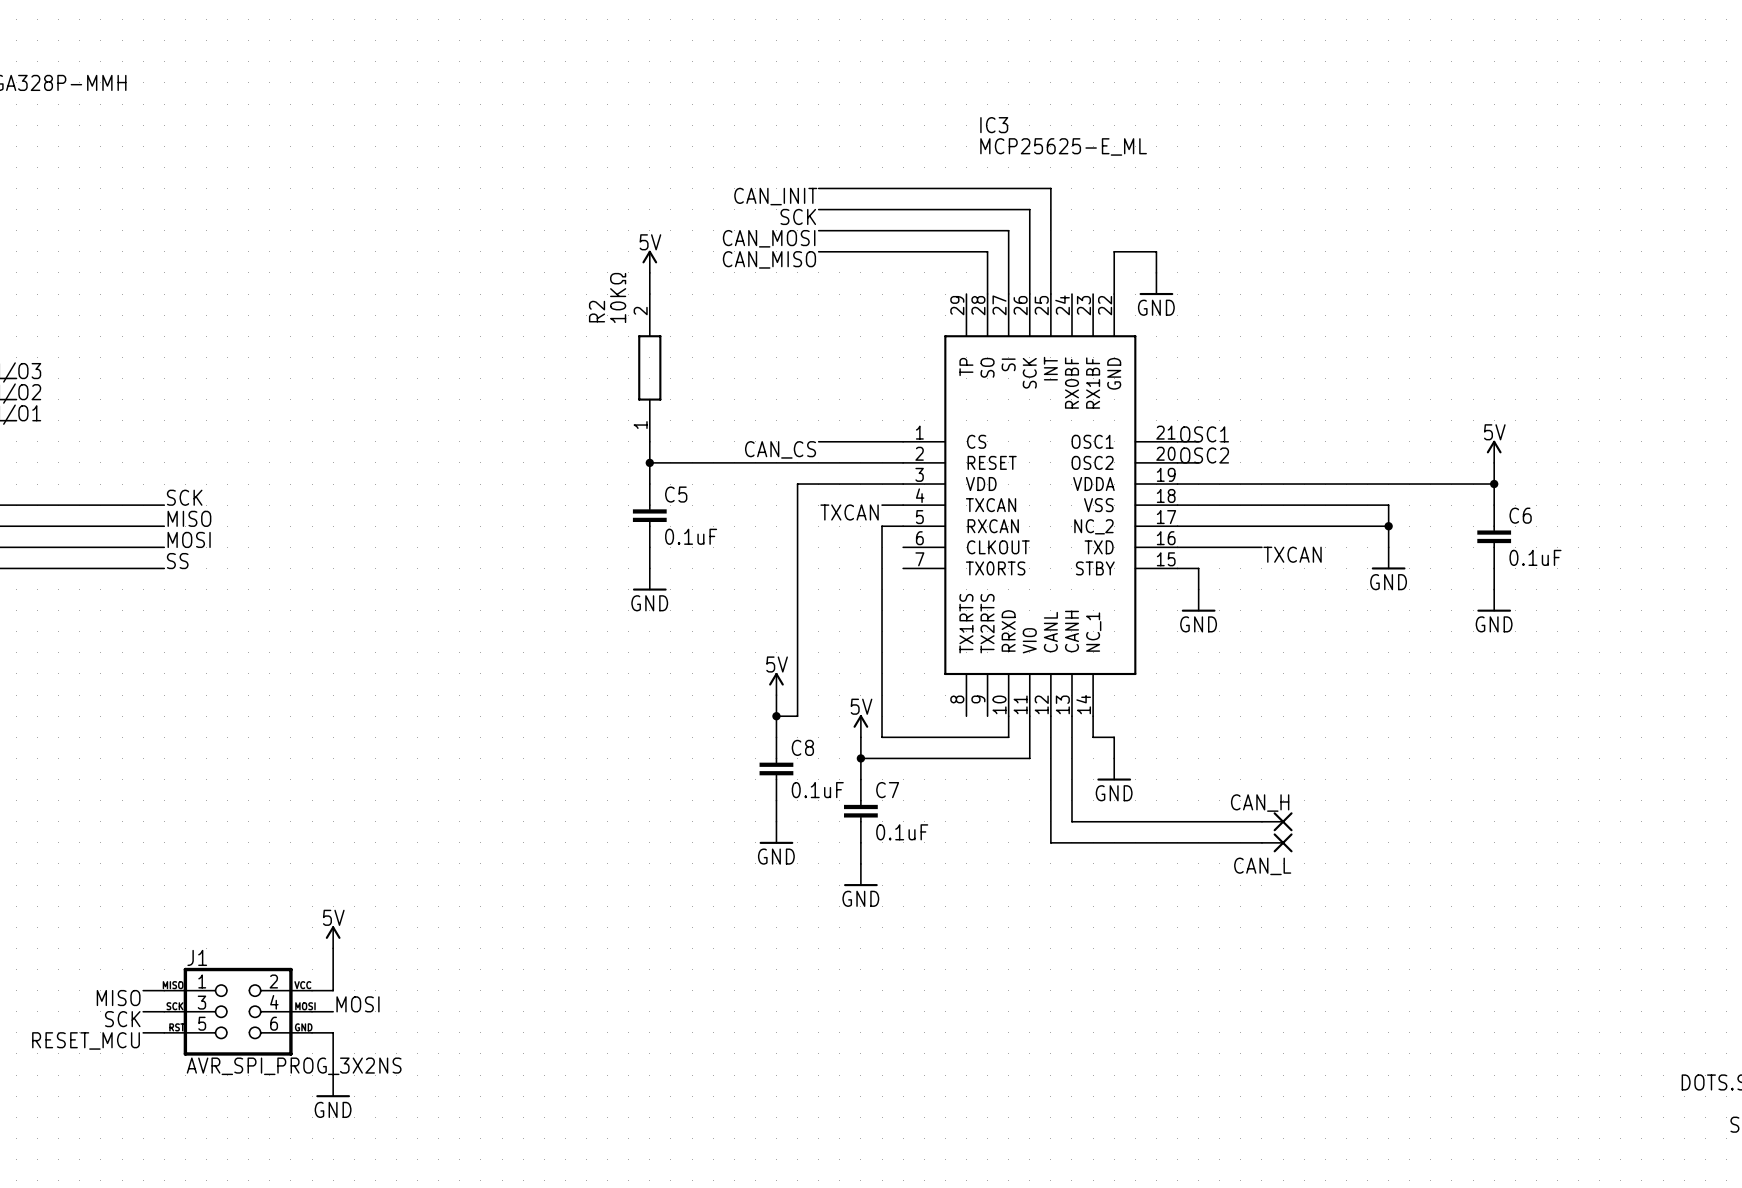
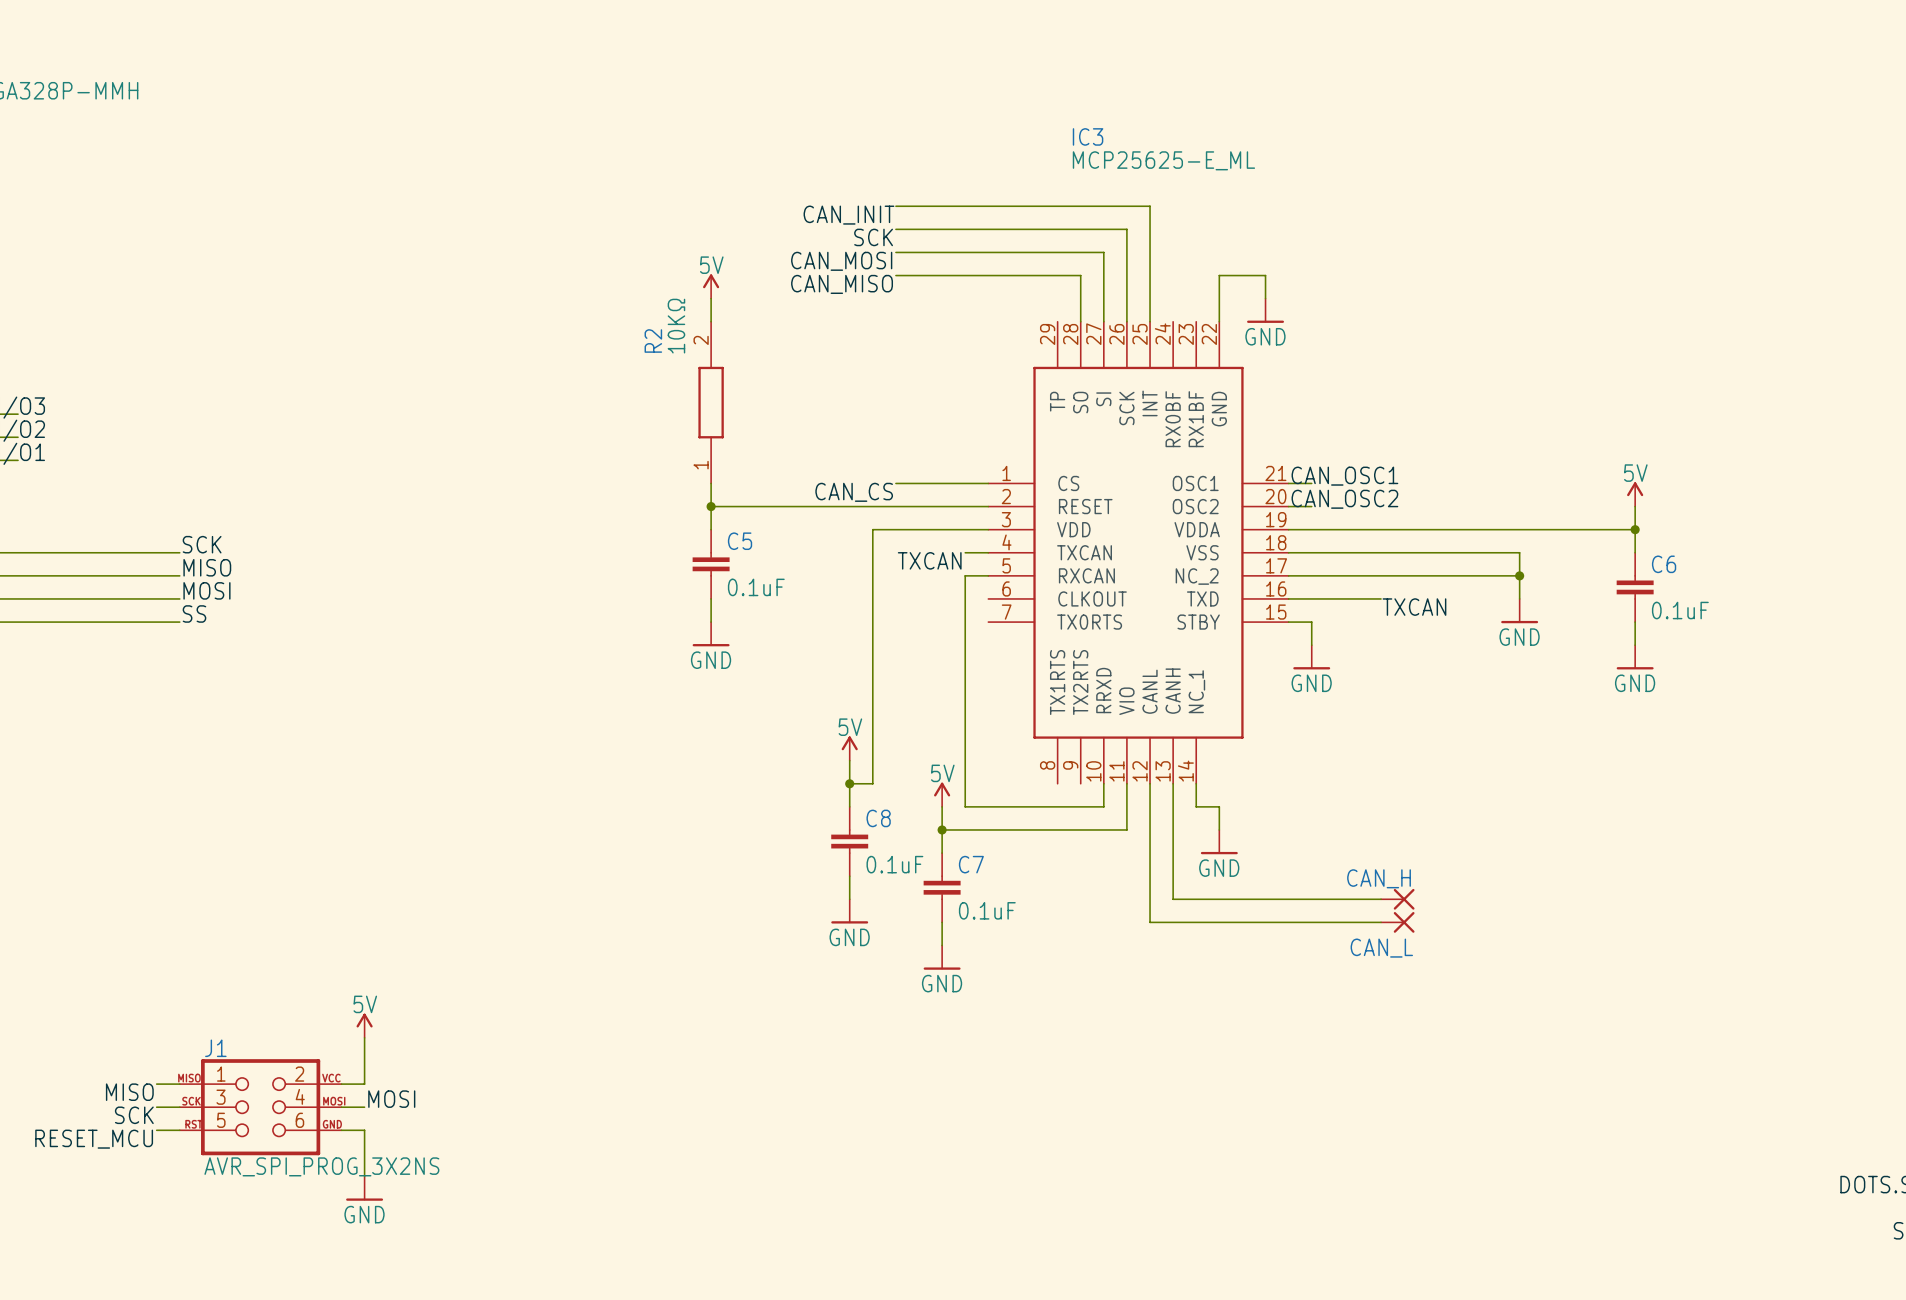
label: OSC1 (1204, 434) -> CAN_OSC1 (1344, 476)
label: OSC2 (1204, 455) -> CAN_OSC2 (1344, 499)

